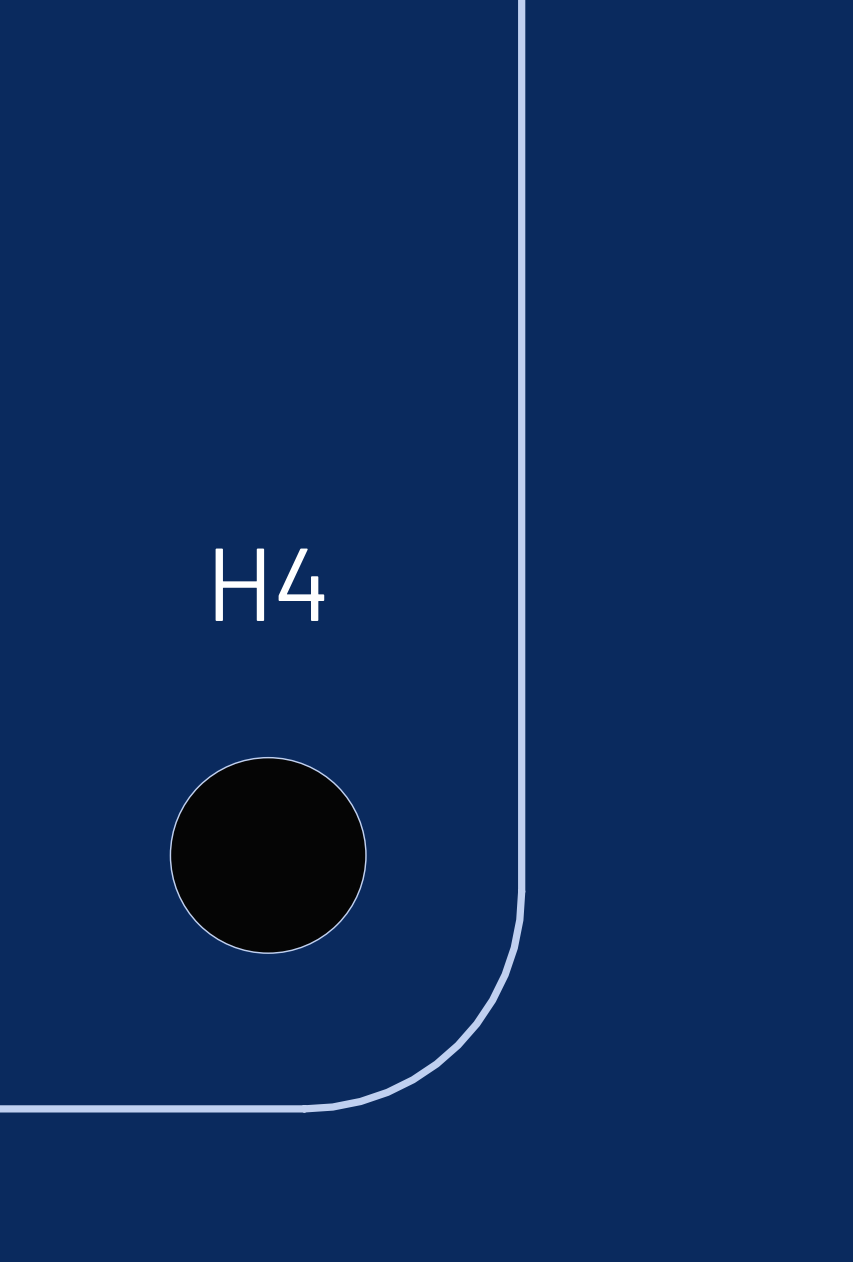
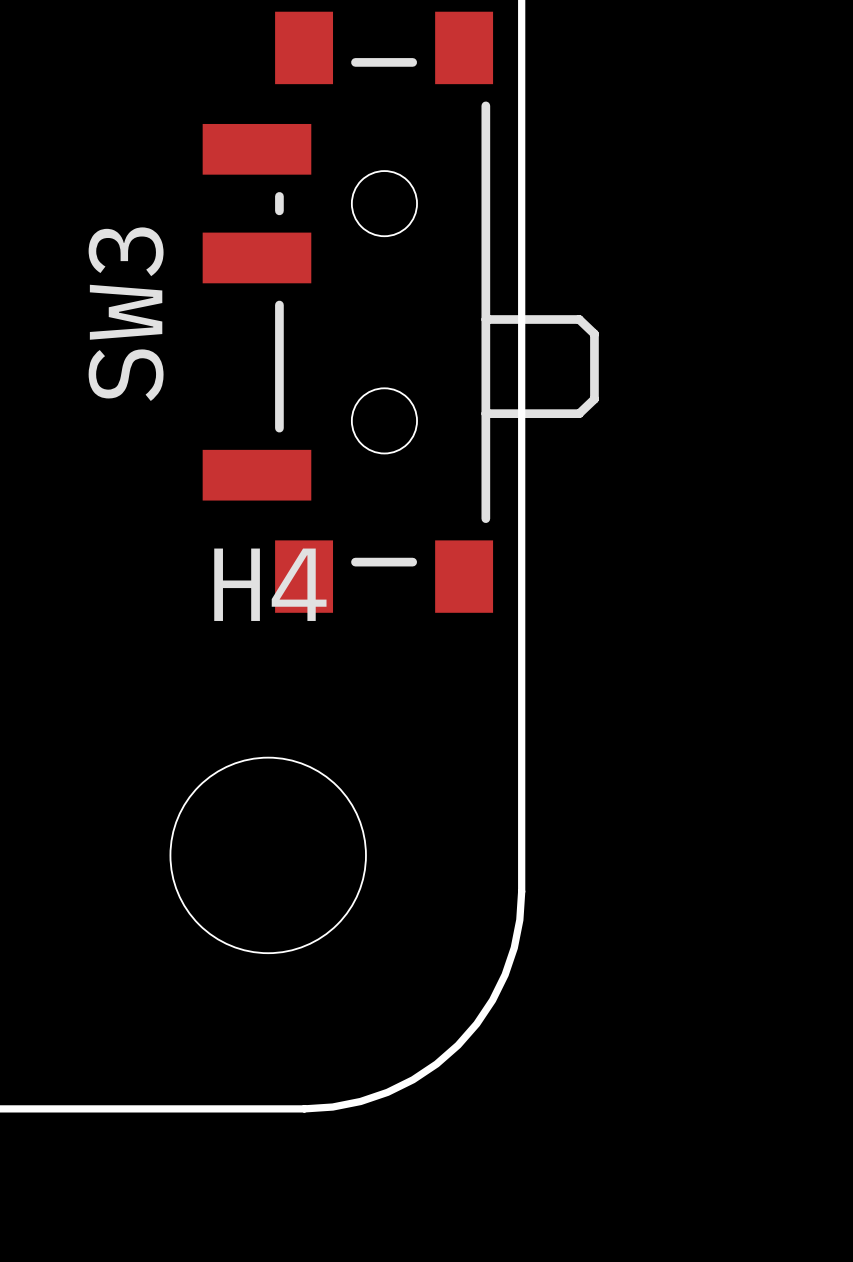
SW3: none -> (400, 312)

